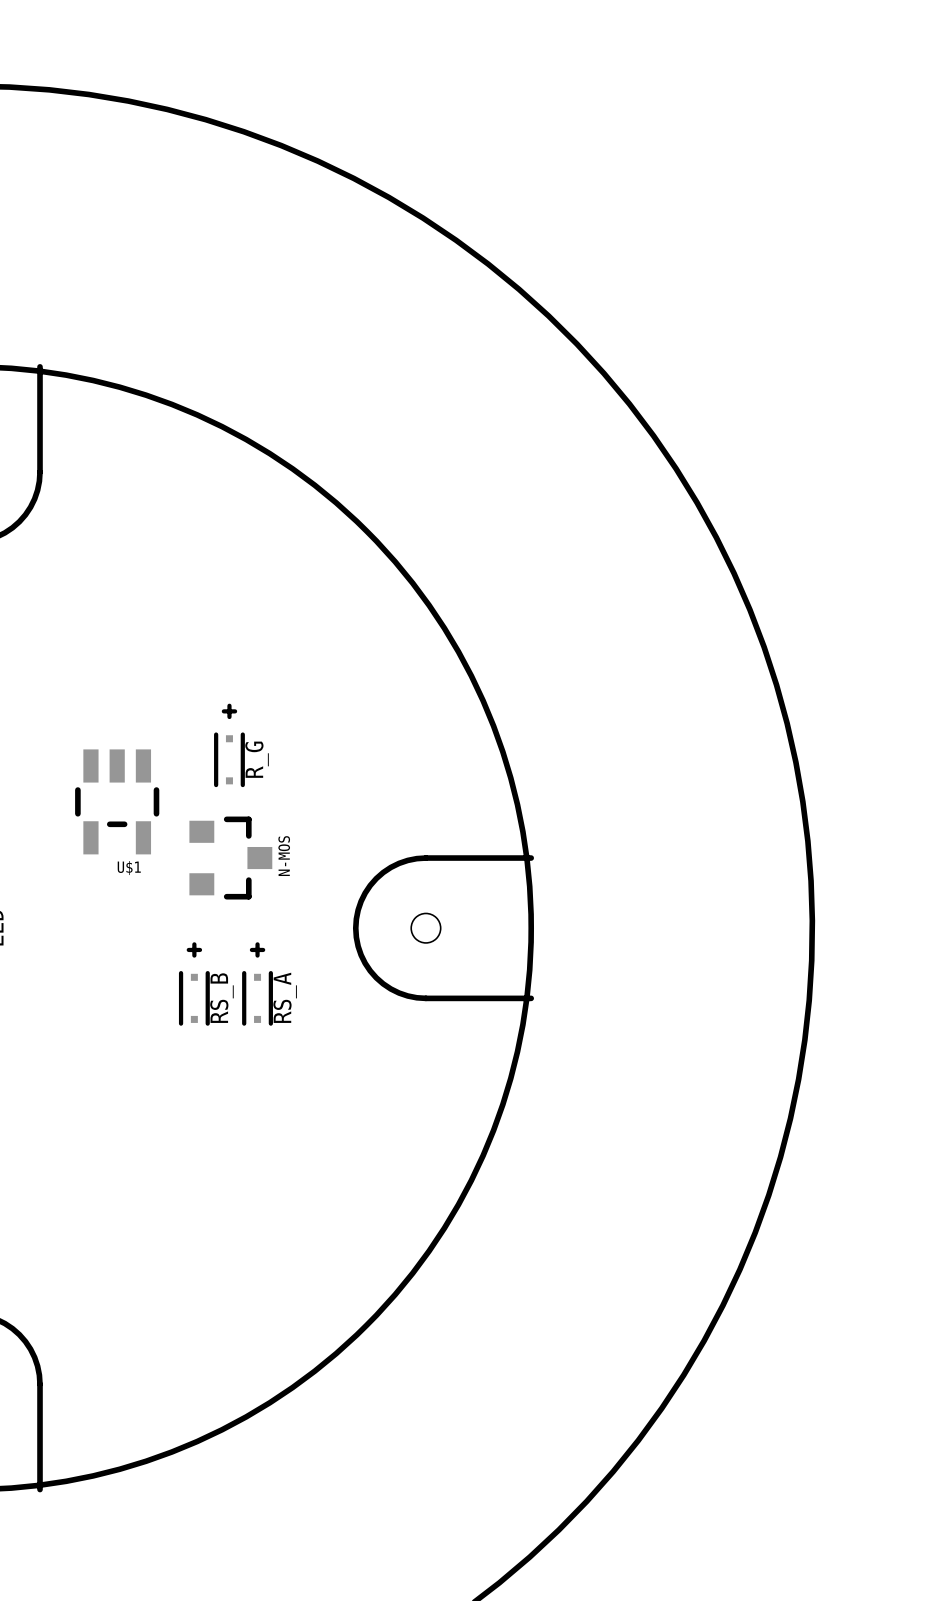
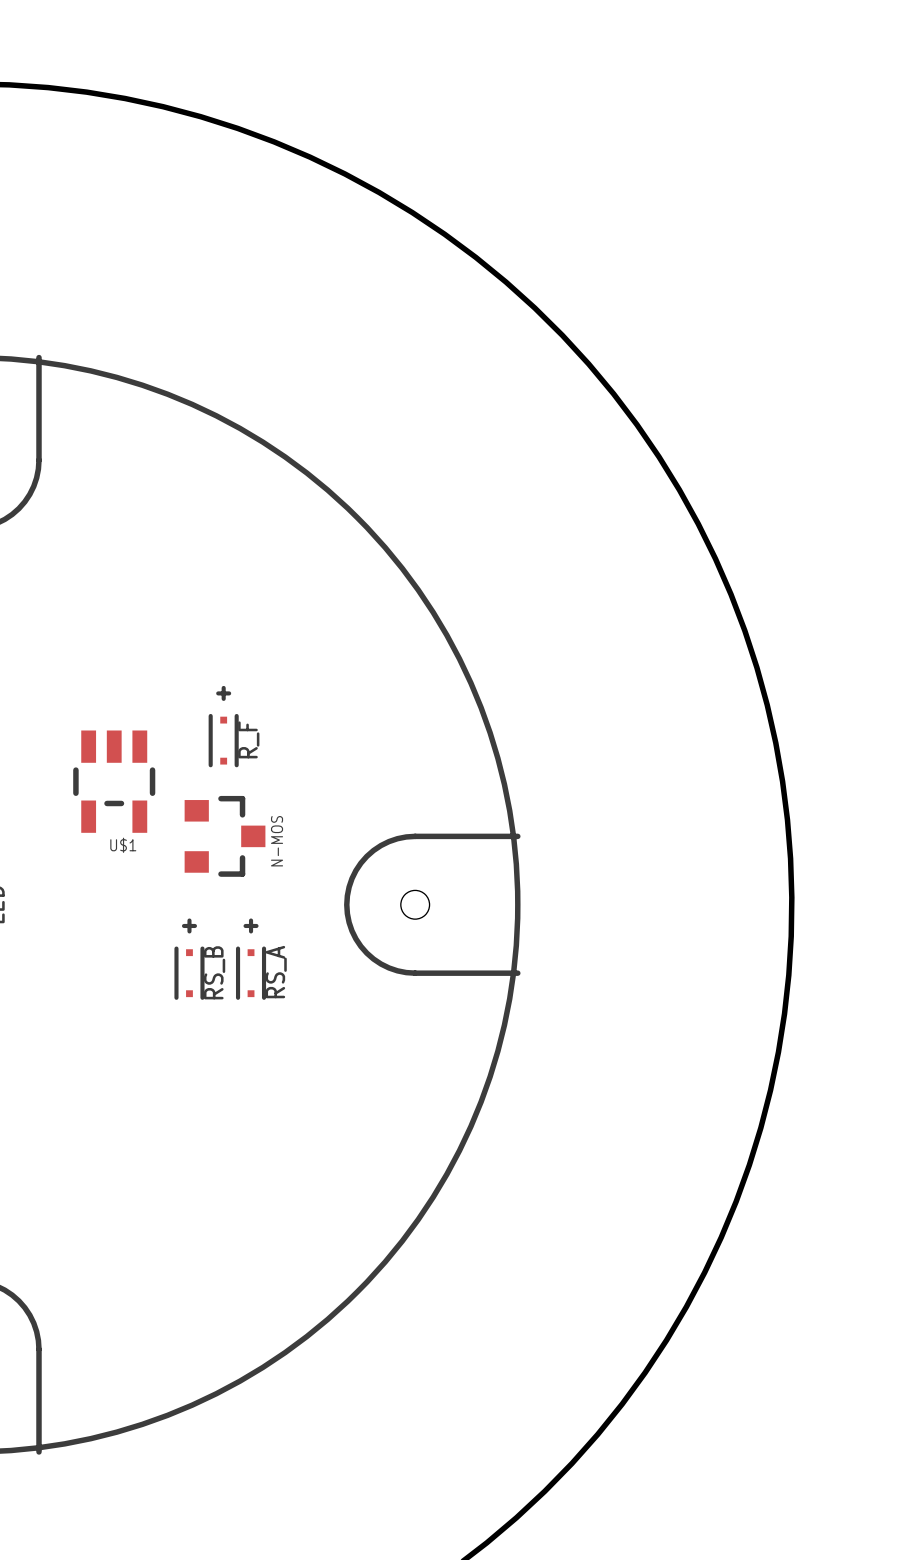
R_G name: R_G (257, 759) -> R_F (248, 739)

